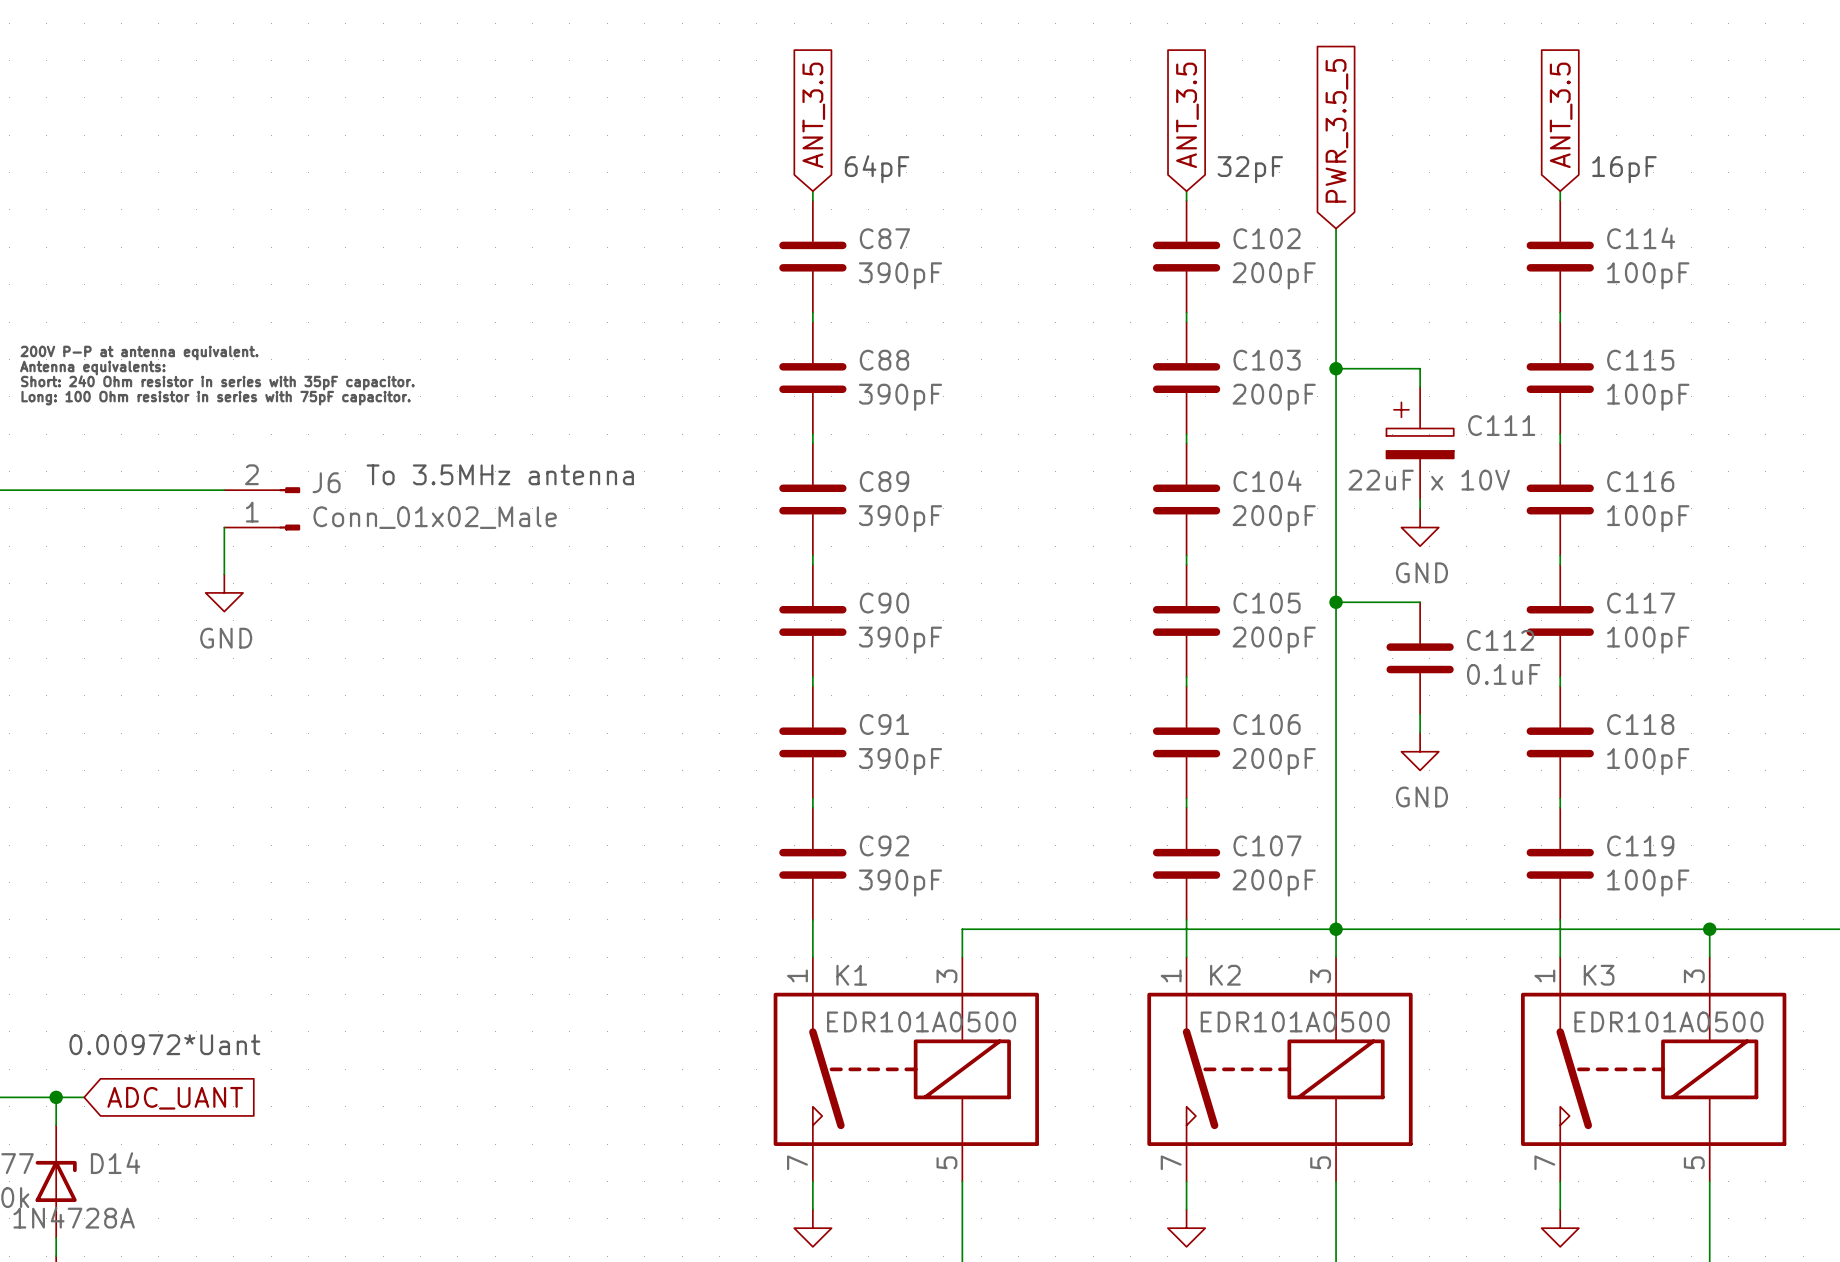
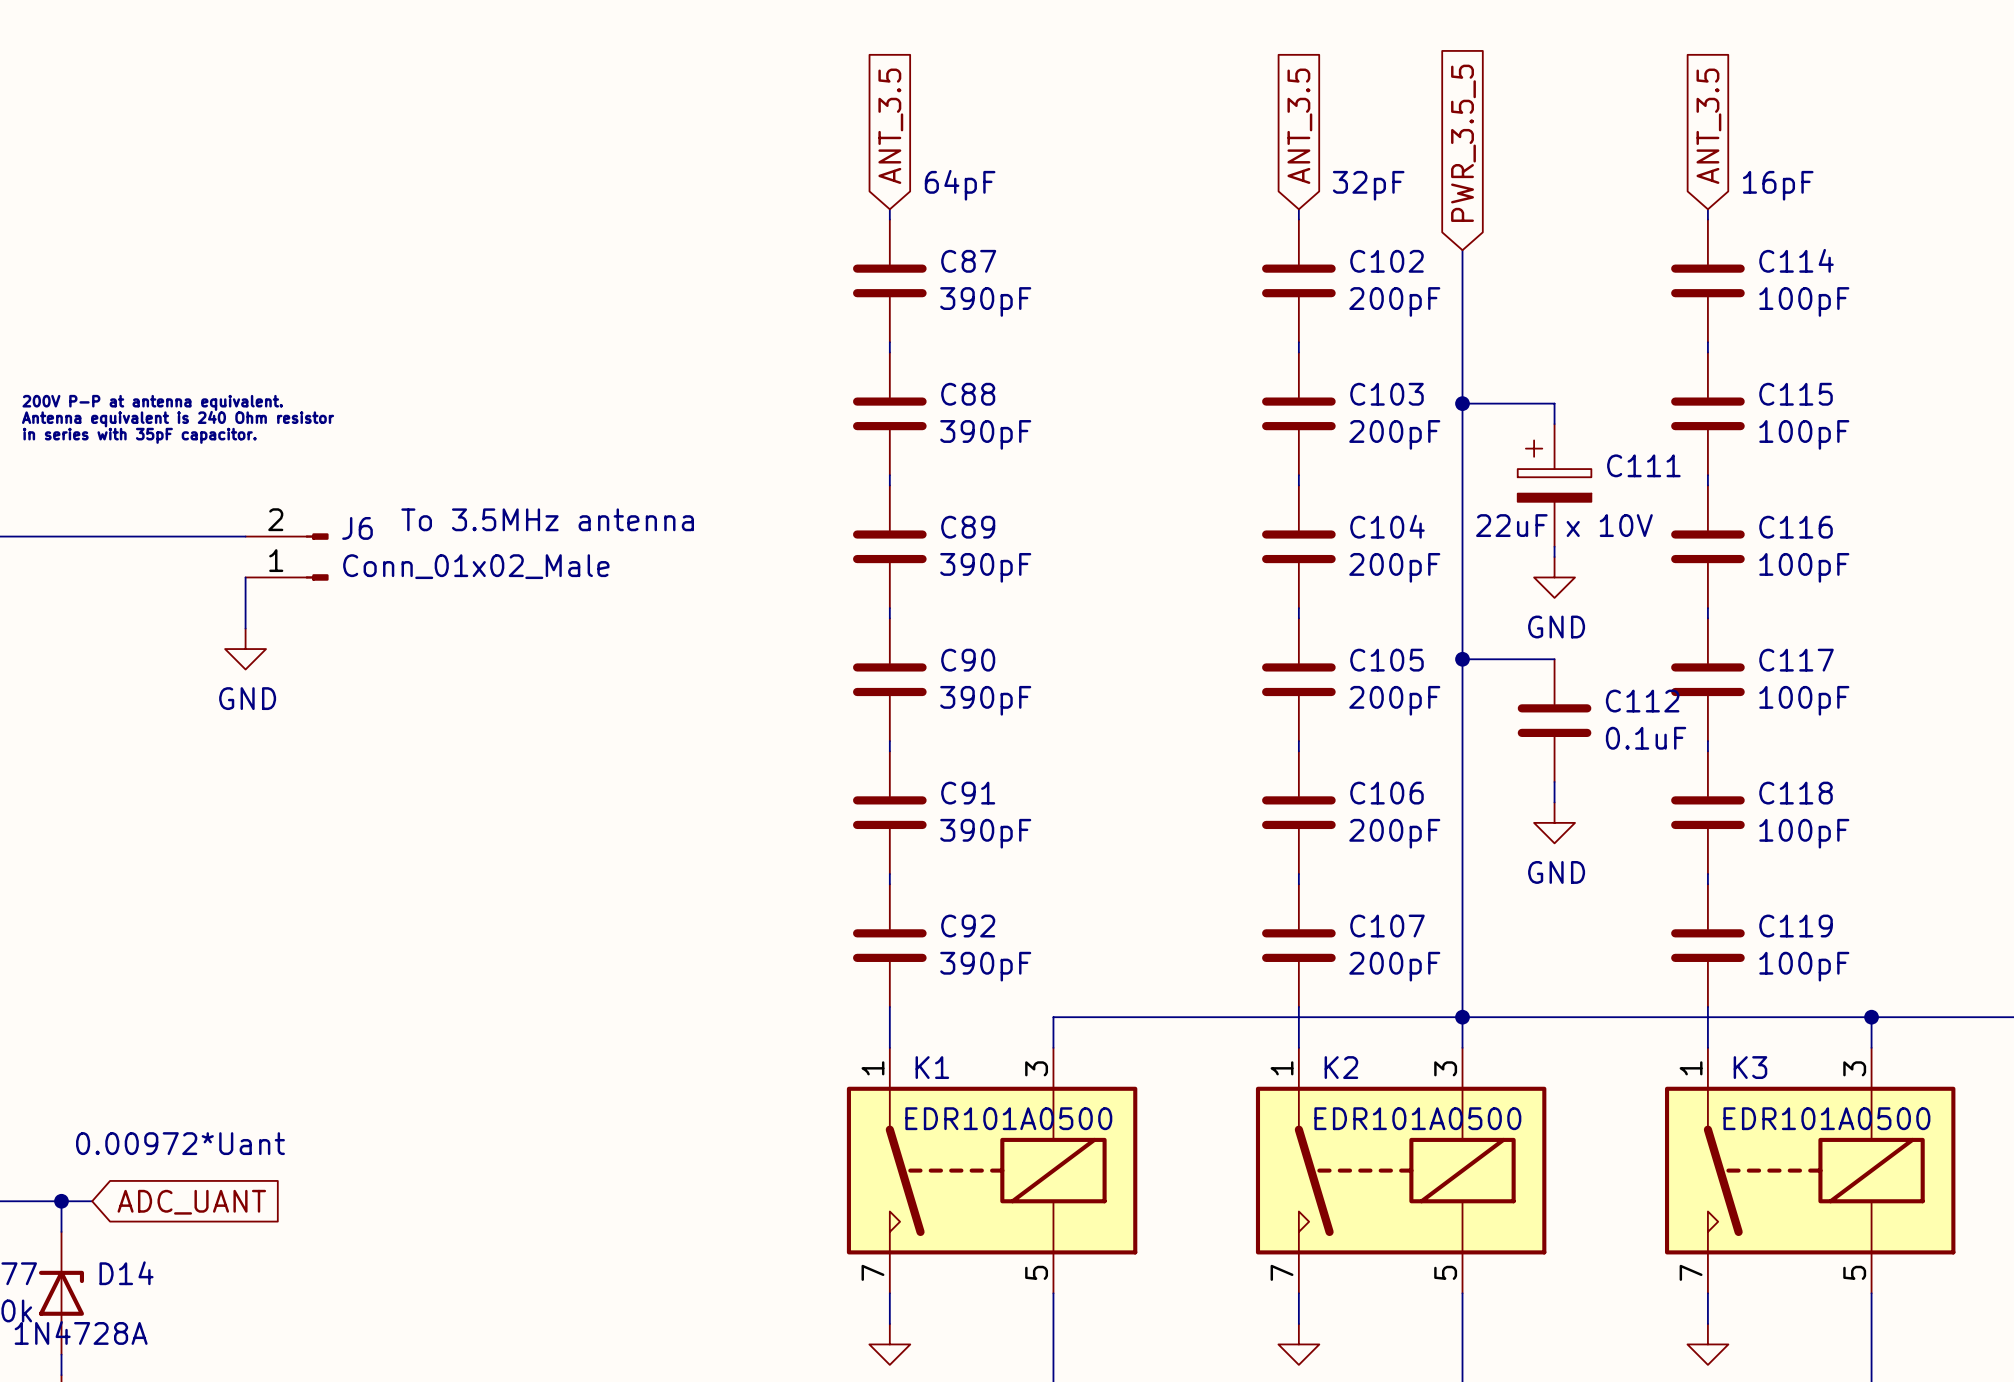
text: 200V P-P at antenna equivalent. (139, 353) -> none
text: Antenna equivalents: (92, 368) -> 200V P-P at antenna equivalent. (152, 402)
text: Short: 240 Ohm resistor in series with 35pF capacitor. (217, 382) -> Antenna equivalent is 240 Ohm resistor (178, 419)
text: Long: 100 Ohm resistor in series with 75pF capacitor. (216, 398) -> in series with 35pF capacitor. (139, 435)

